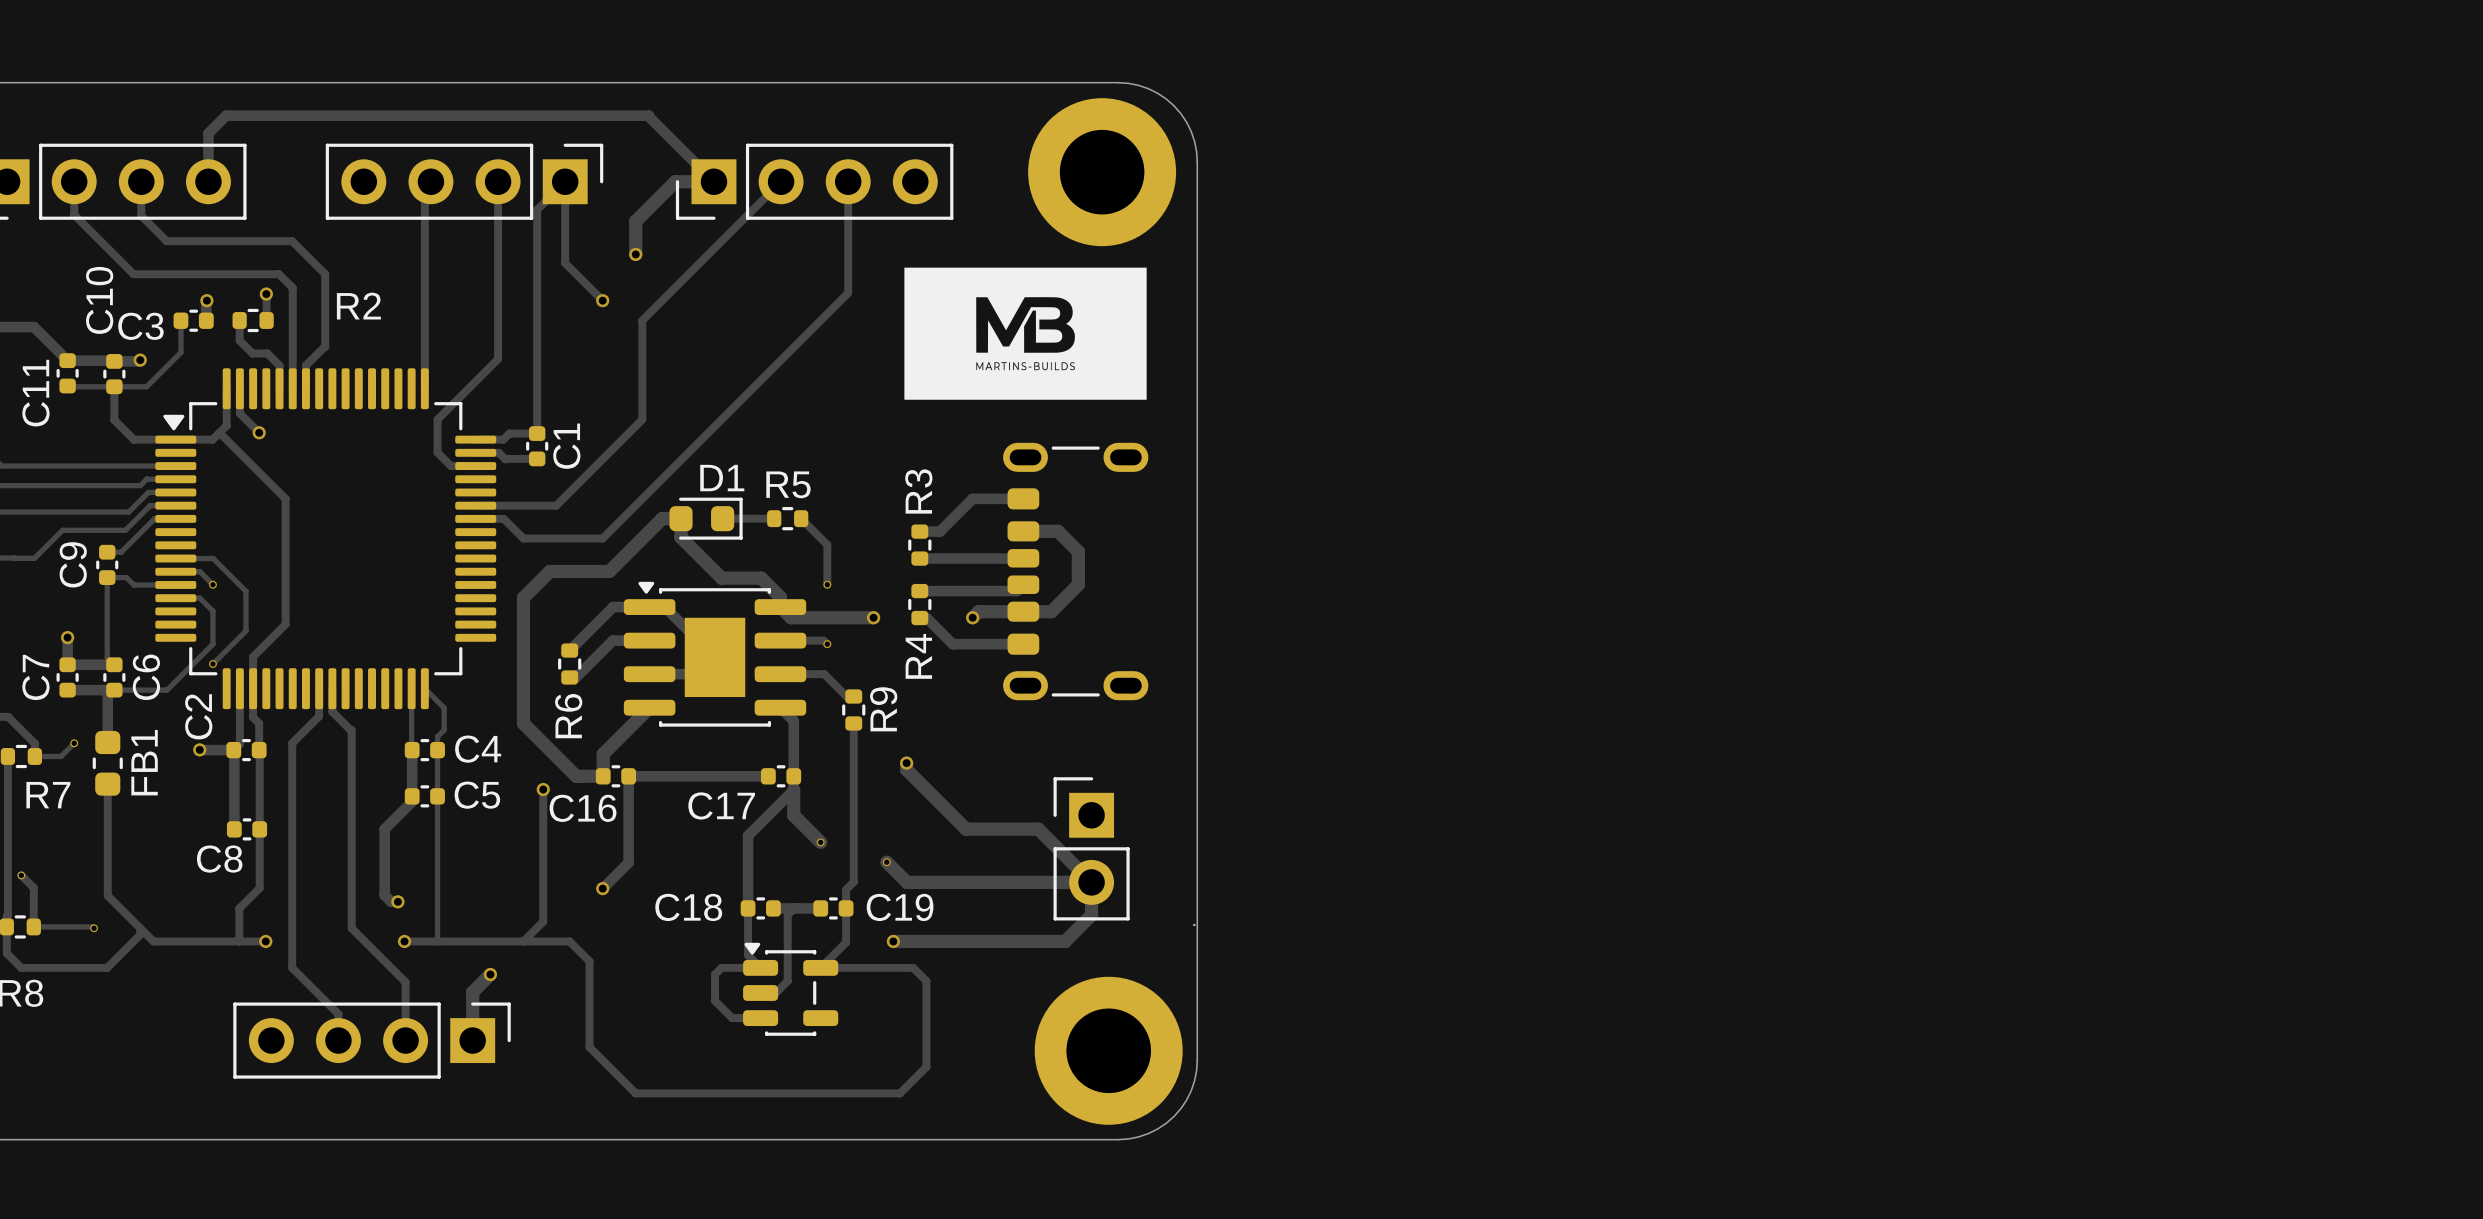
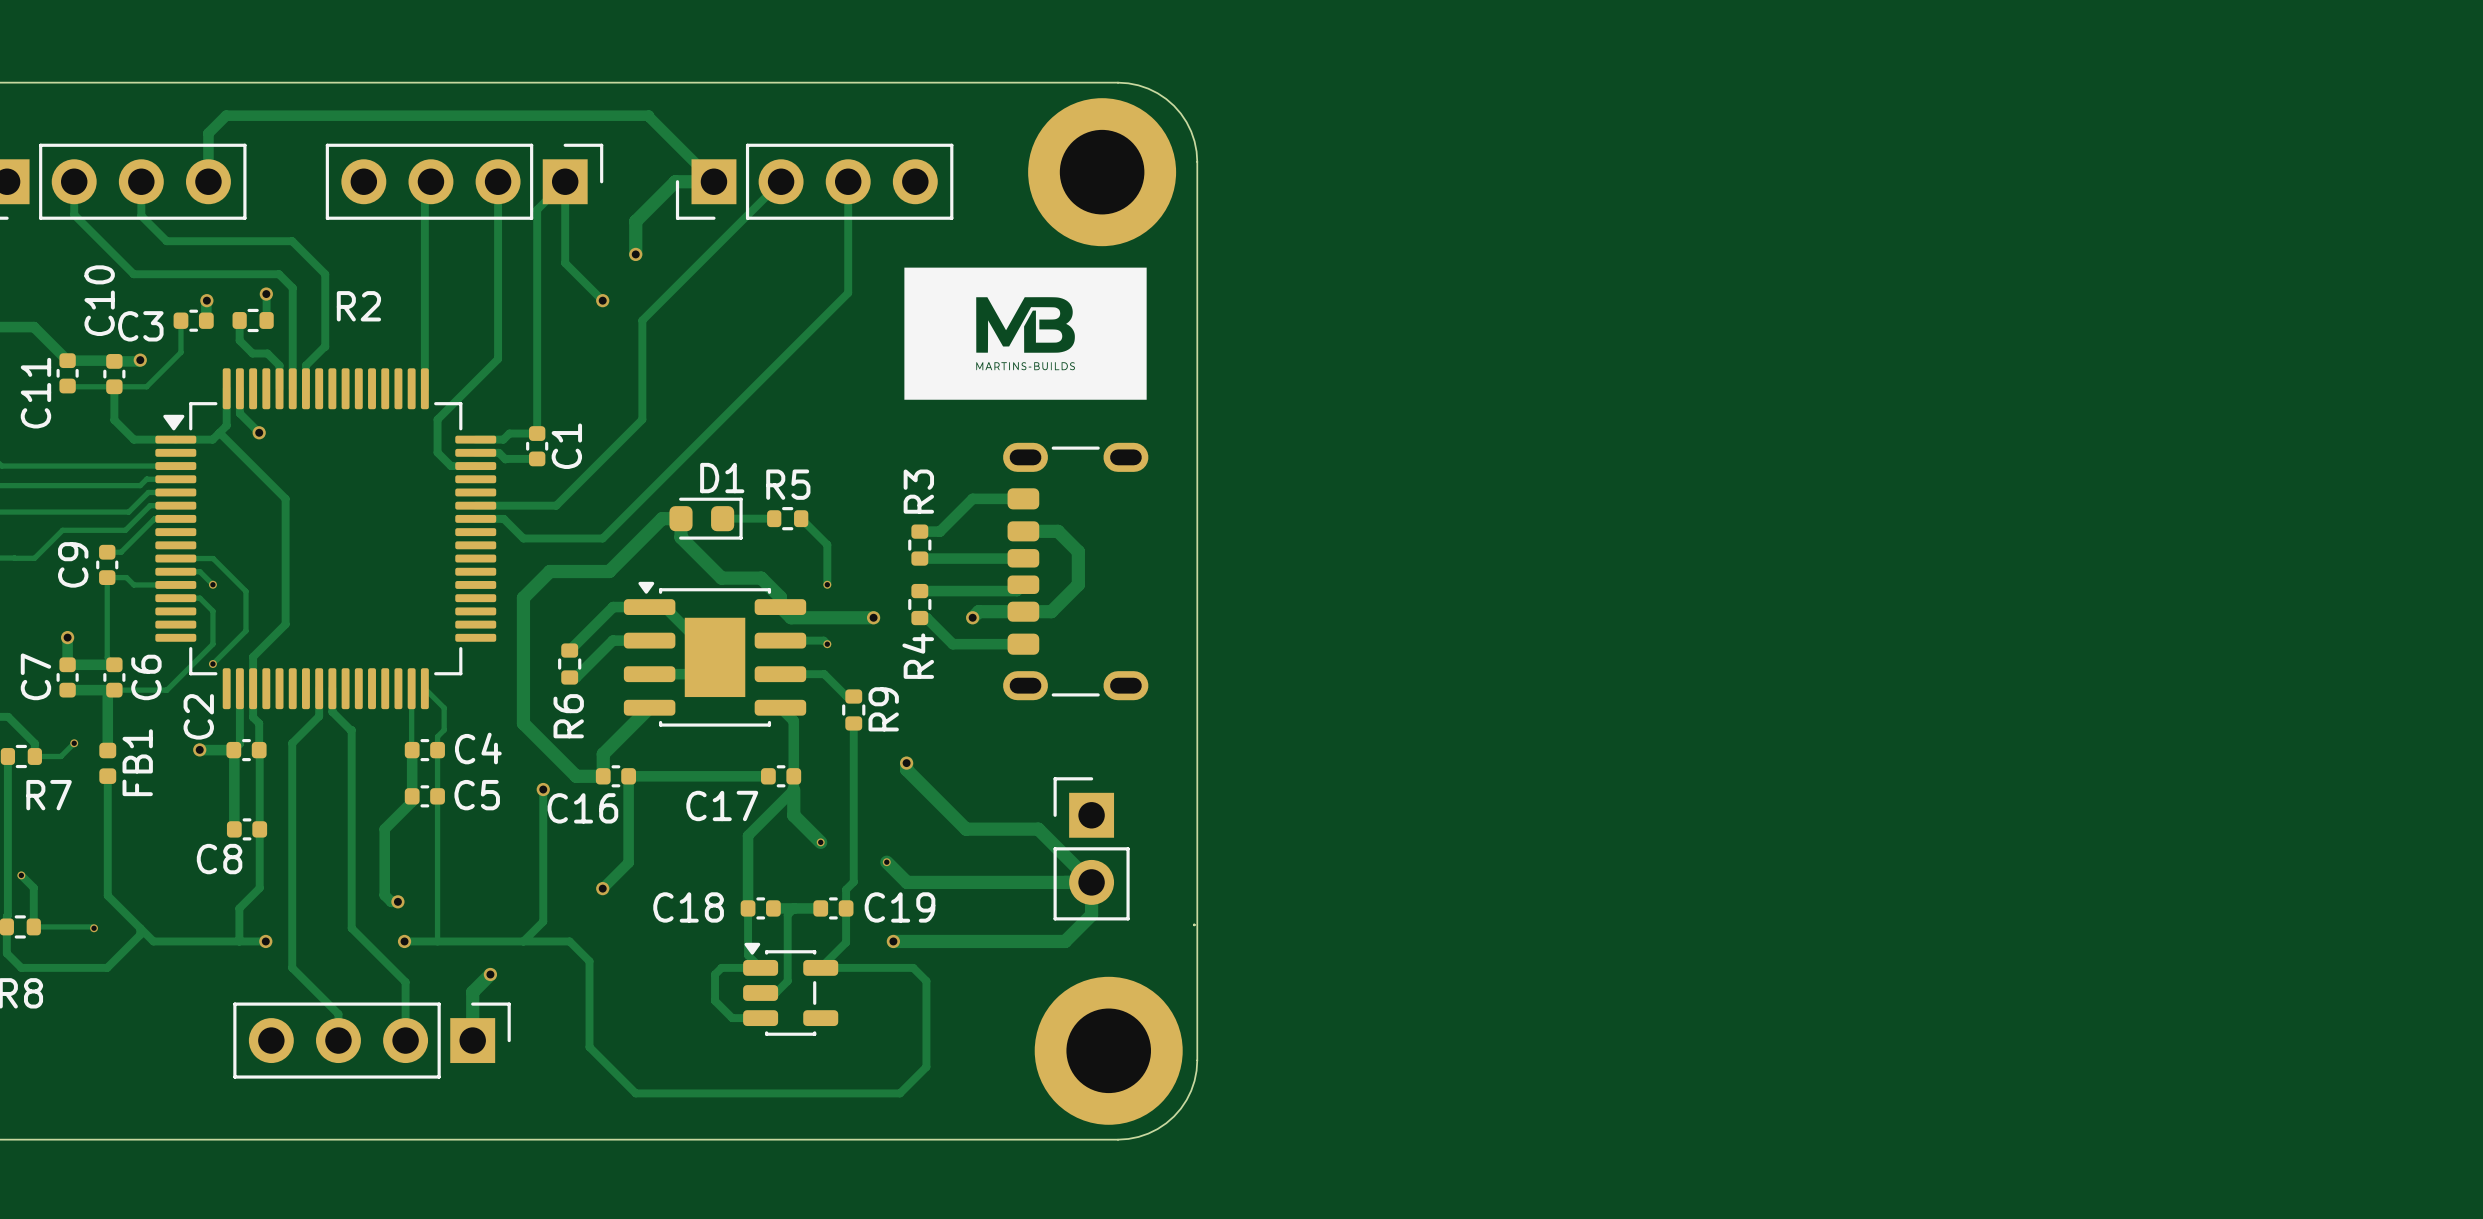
FB1 footprint: [92, 730, 123, 796] -> [99, 742, 117, 784]

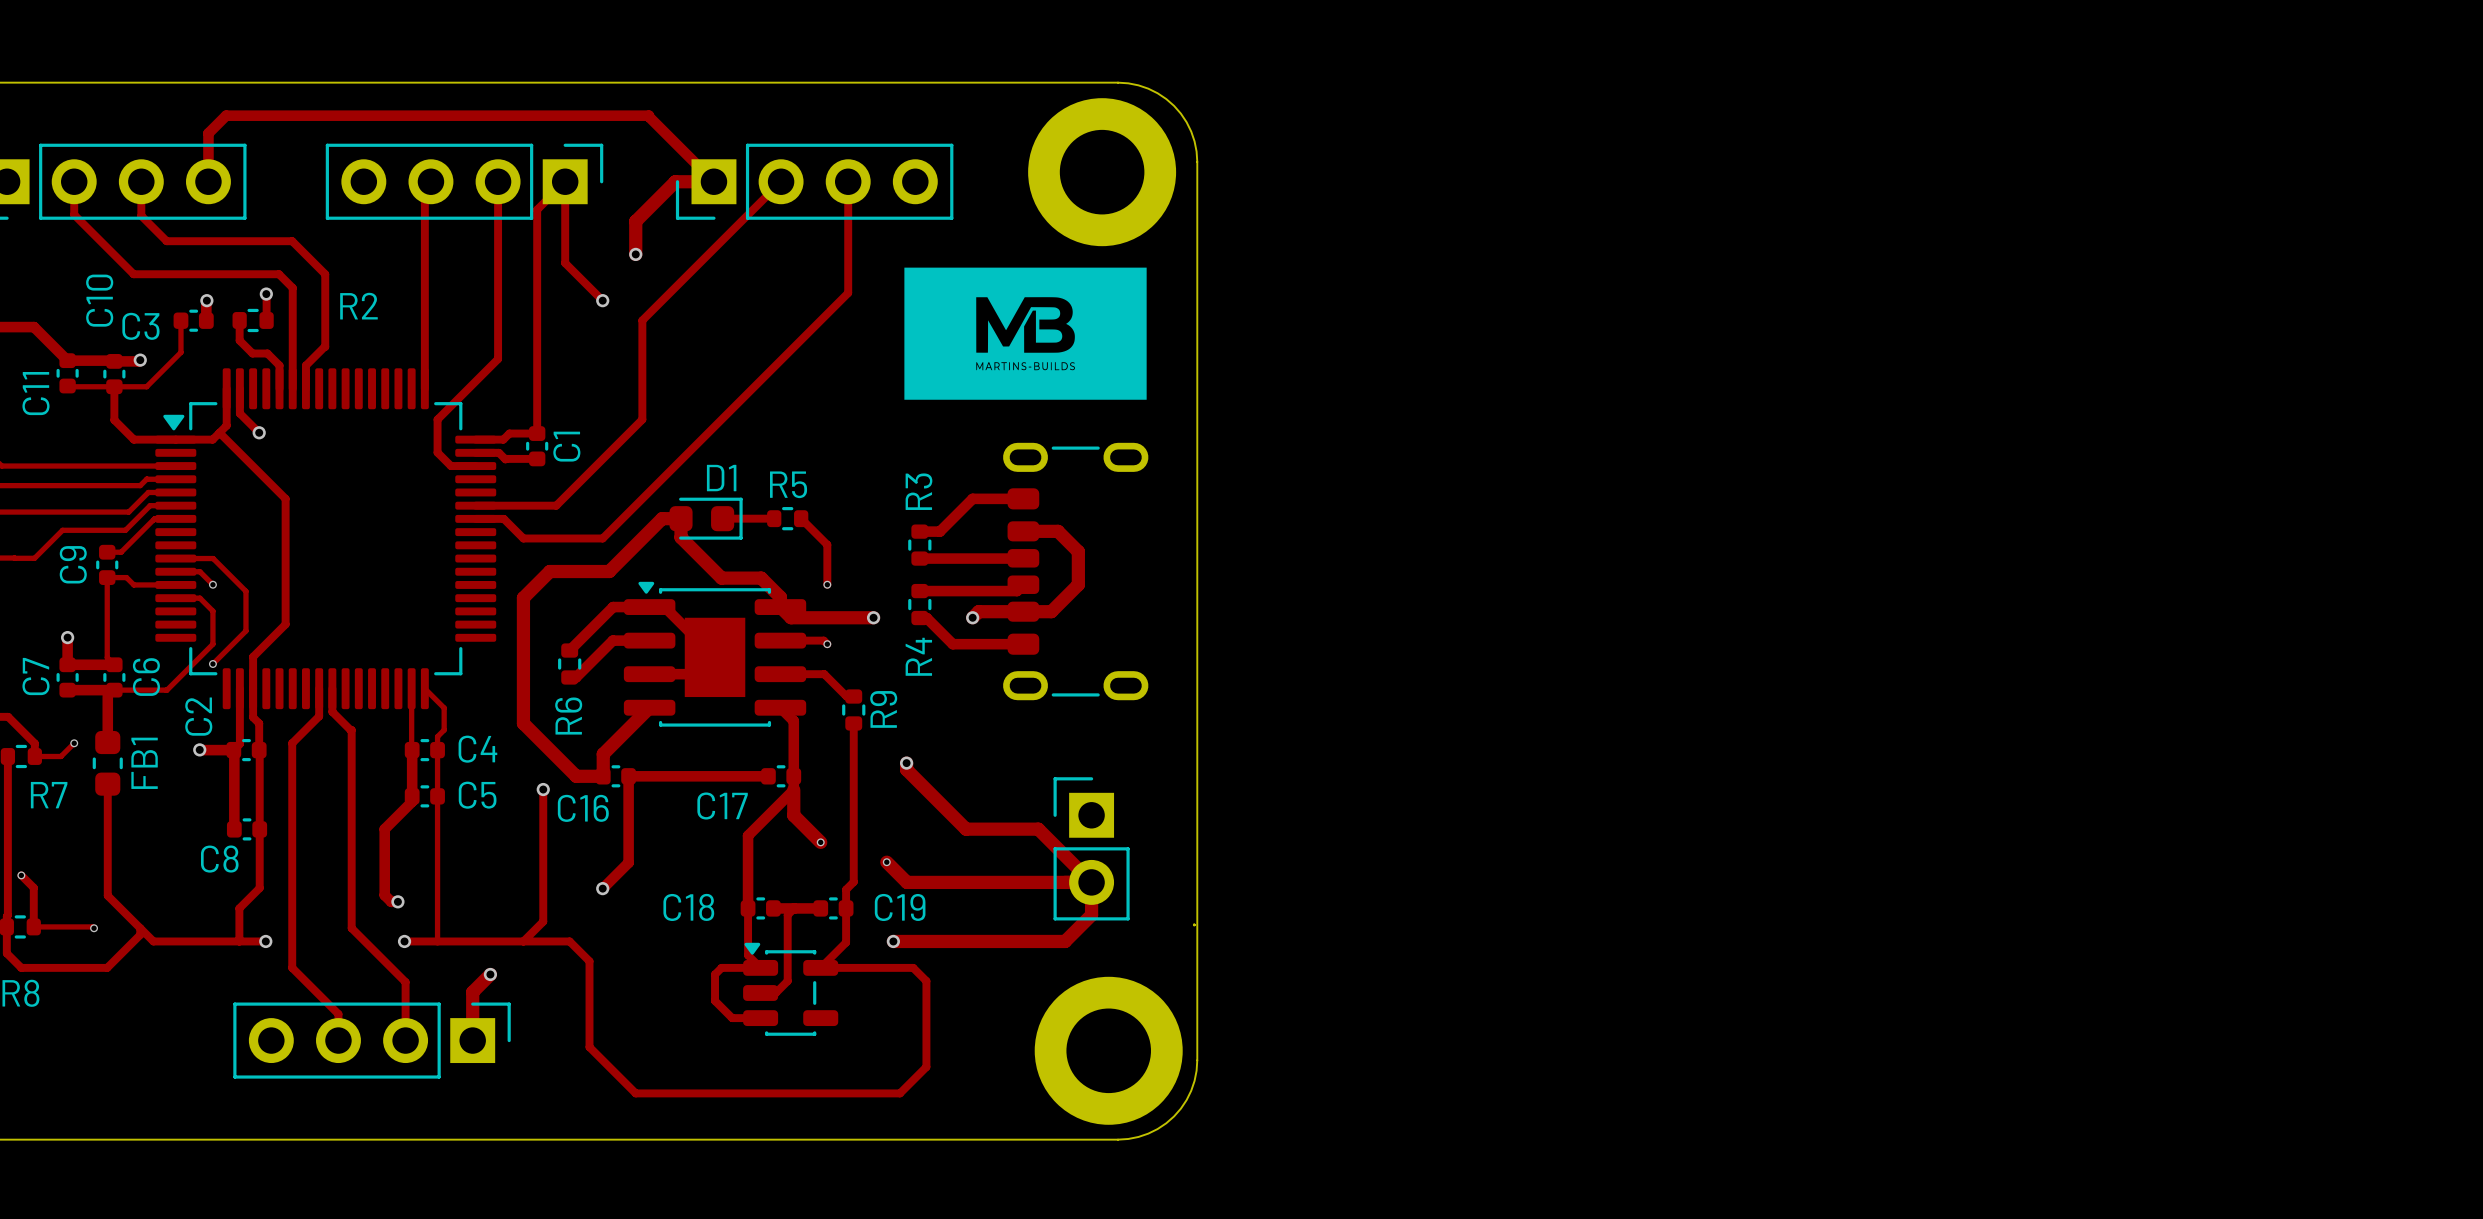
FB1 footprint: [99, 742, 117, 784] -> [92, 730, 123, 796]

